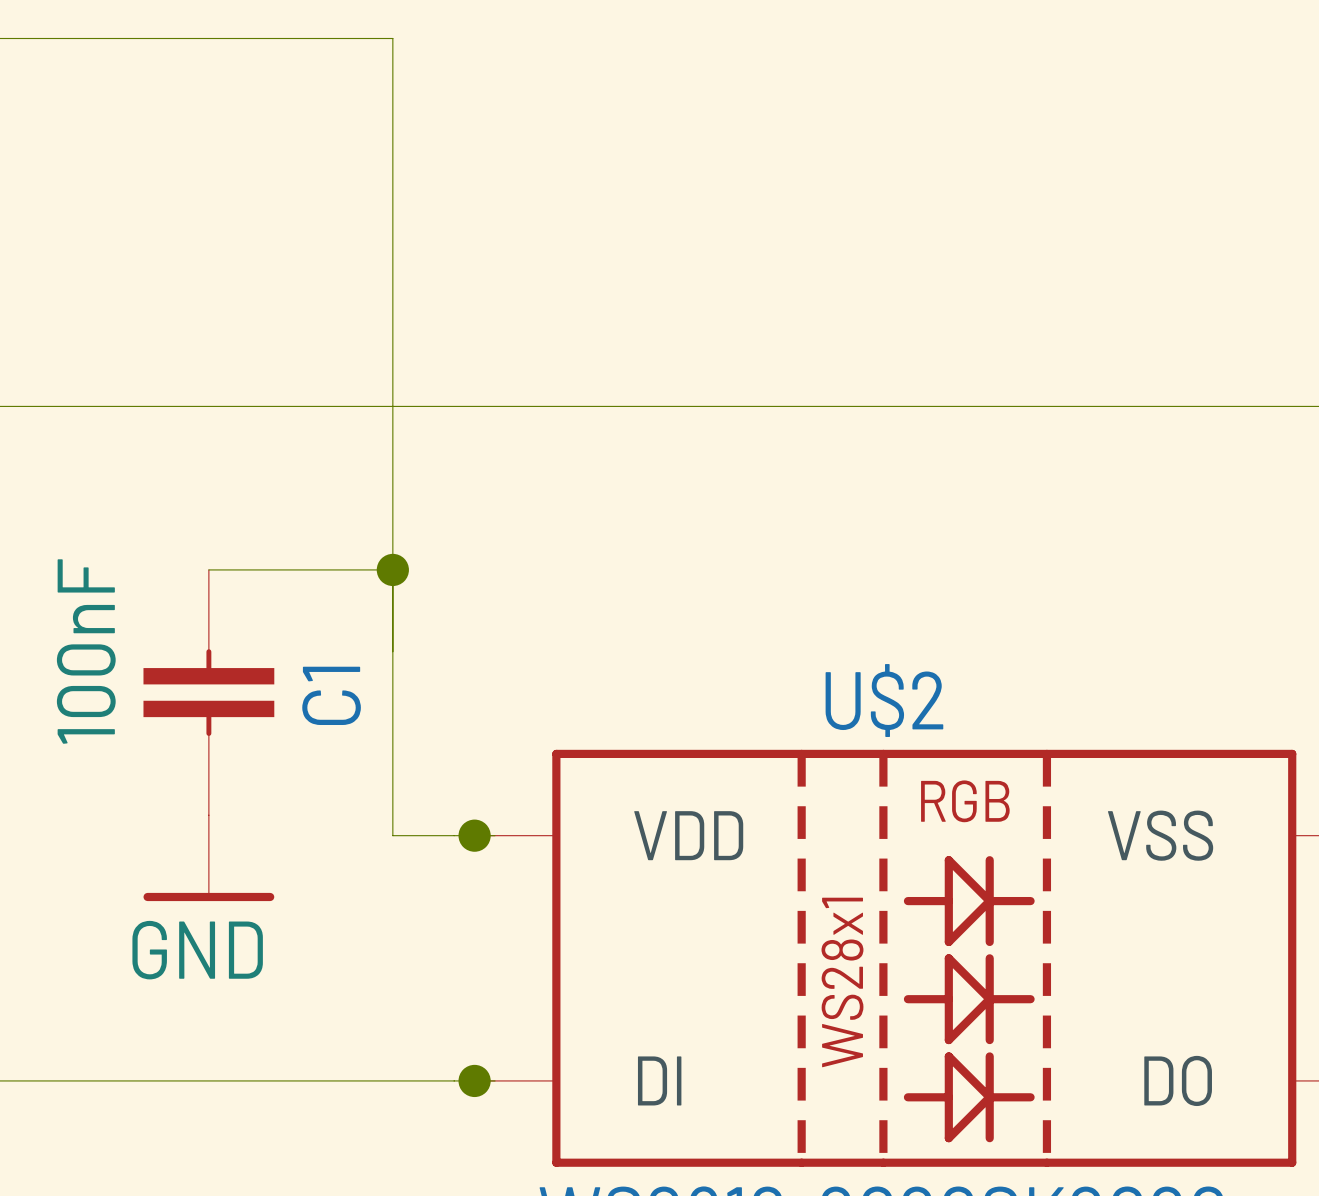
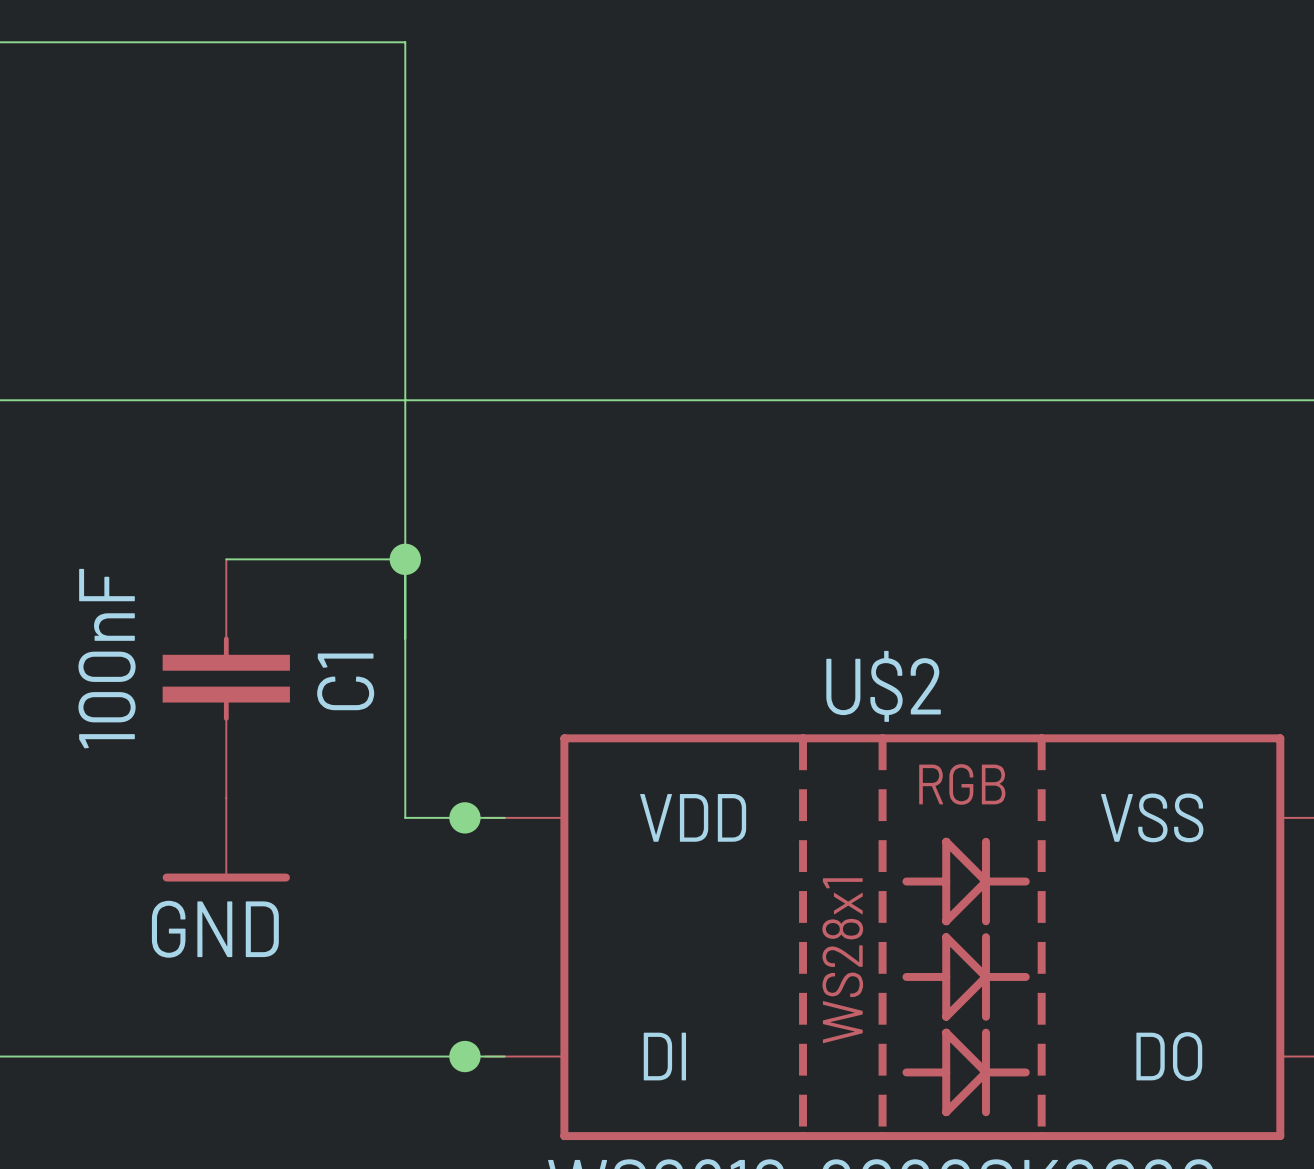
C1 value position: 100nF (86, 651) -> 100nF (107, 658)
junction position: (474, 835) -> (464, 817)
junction position: (474, 1080) -> (464, 1056)

